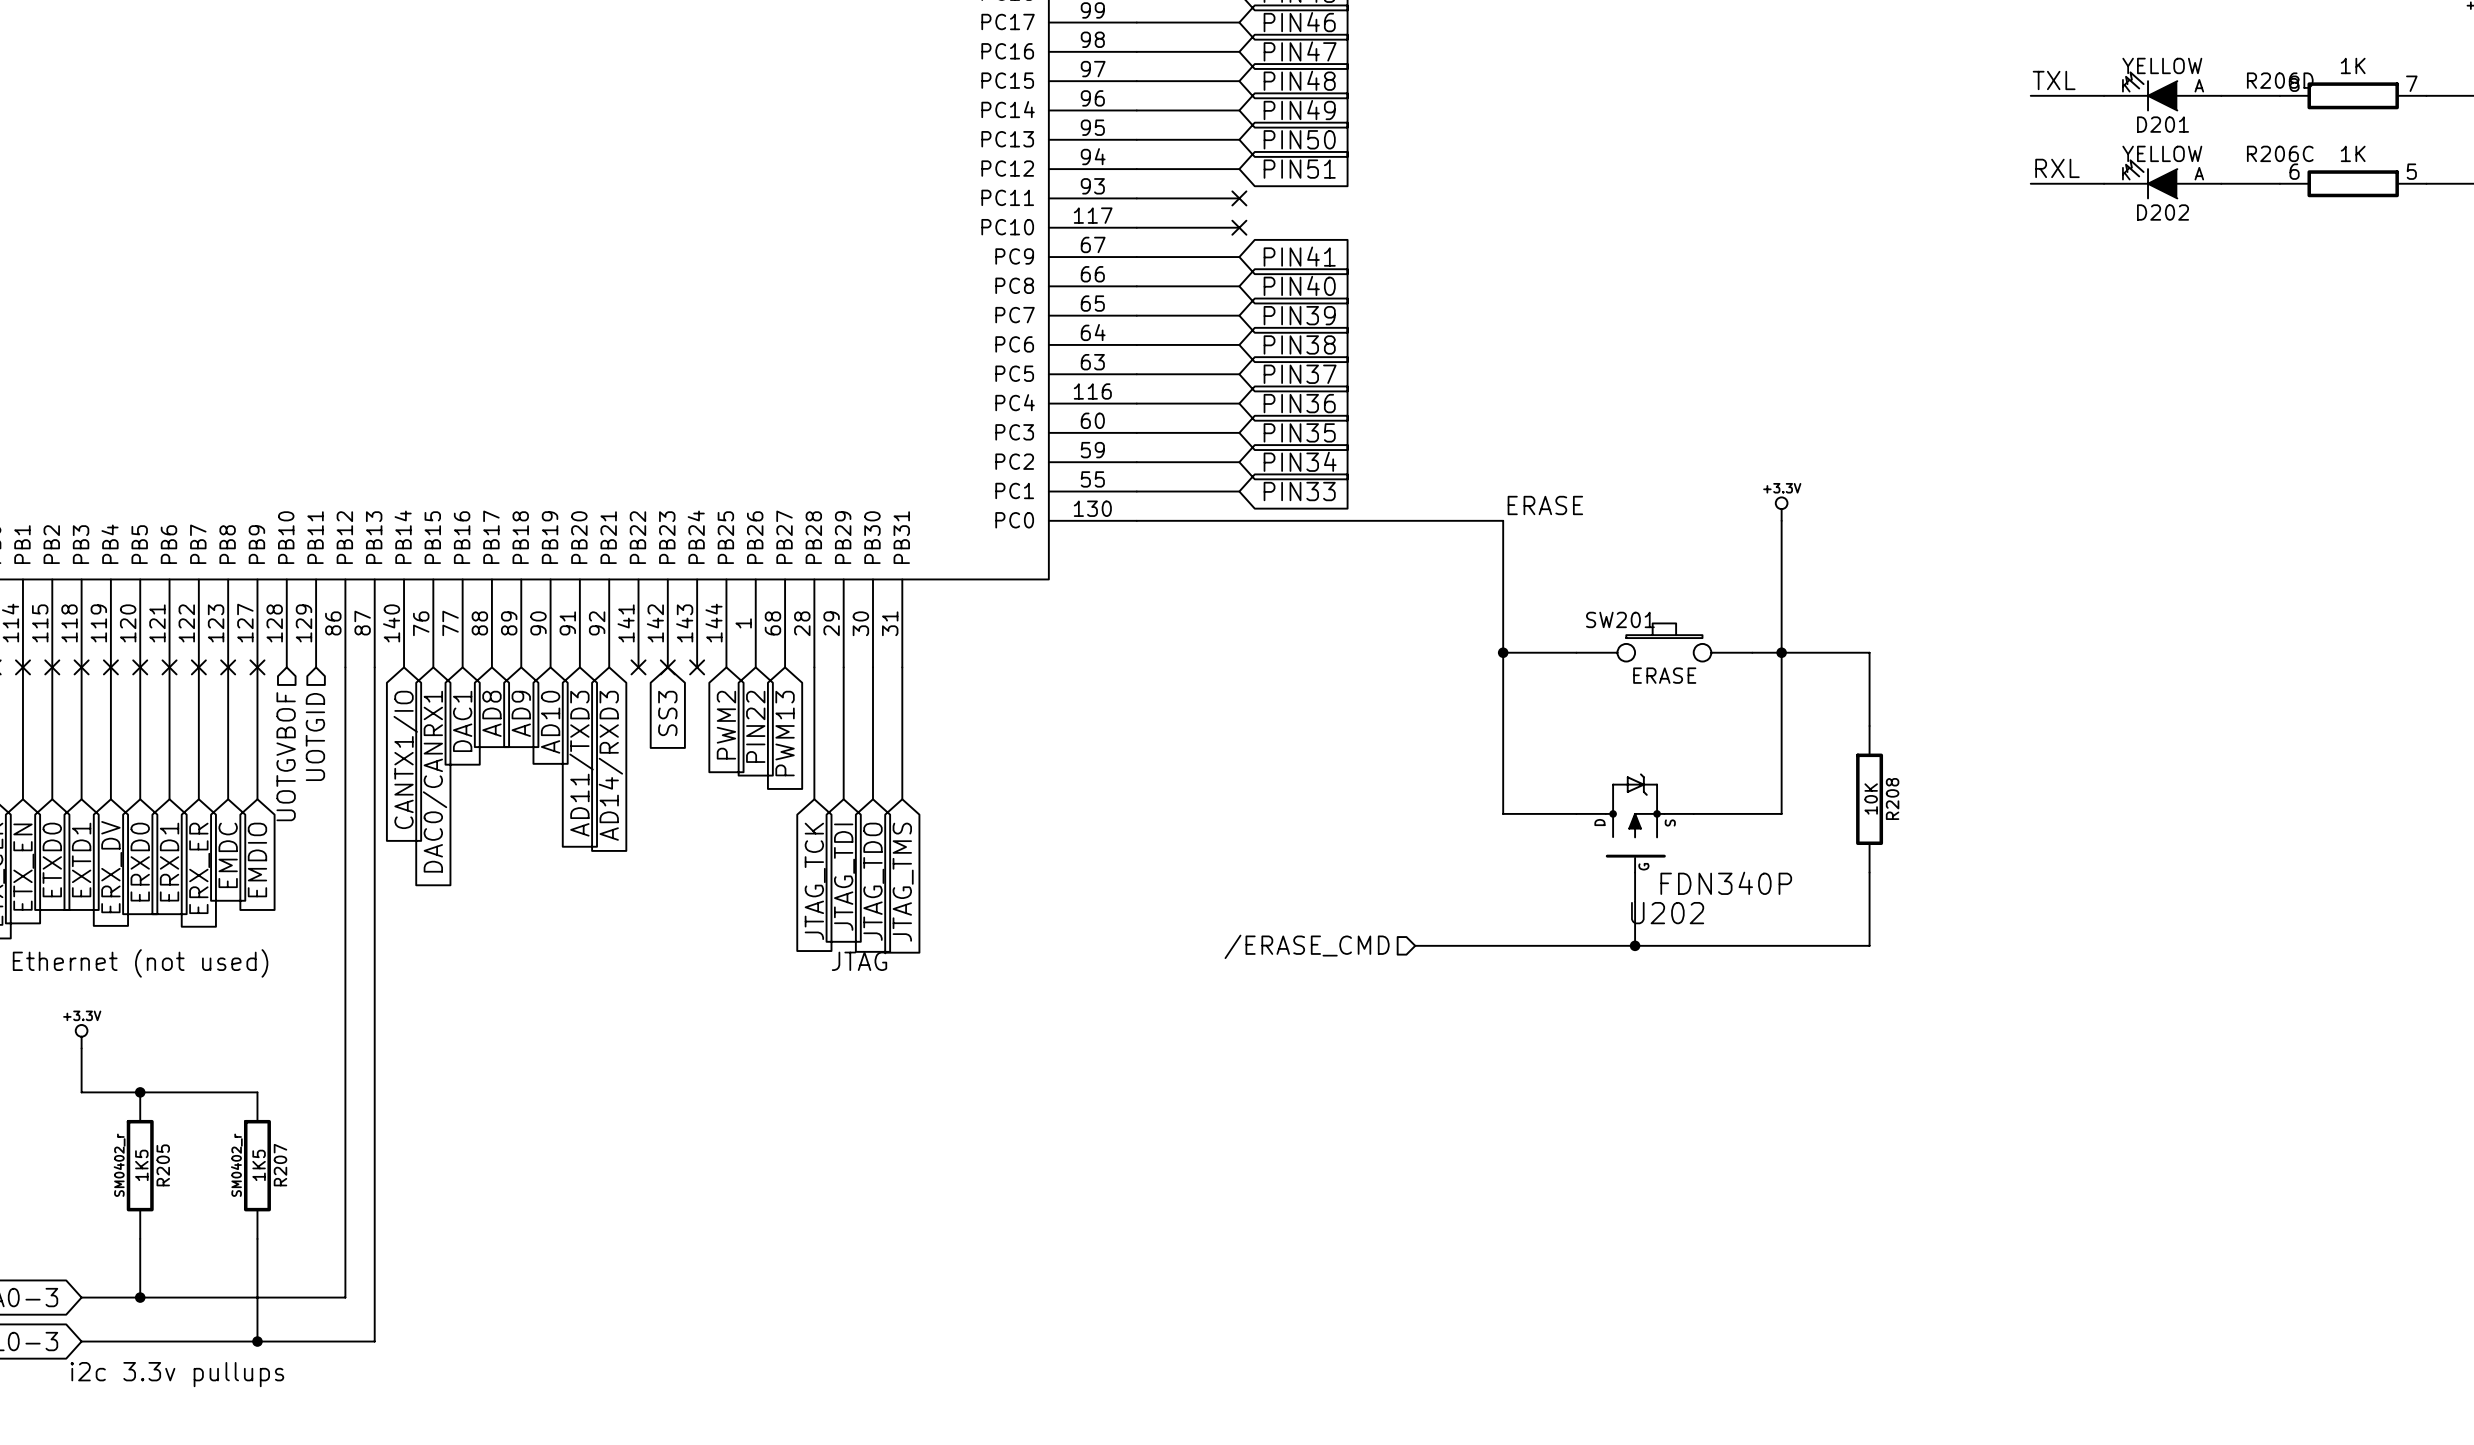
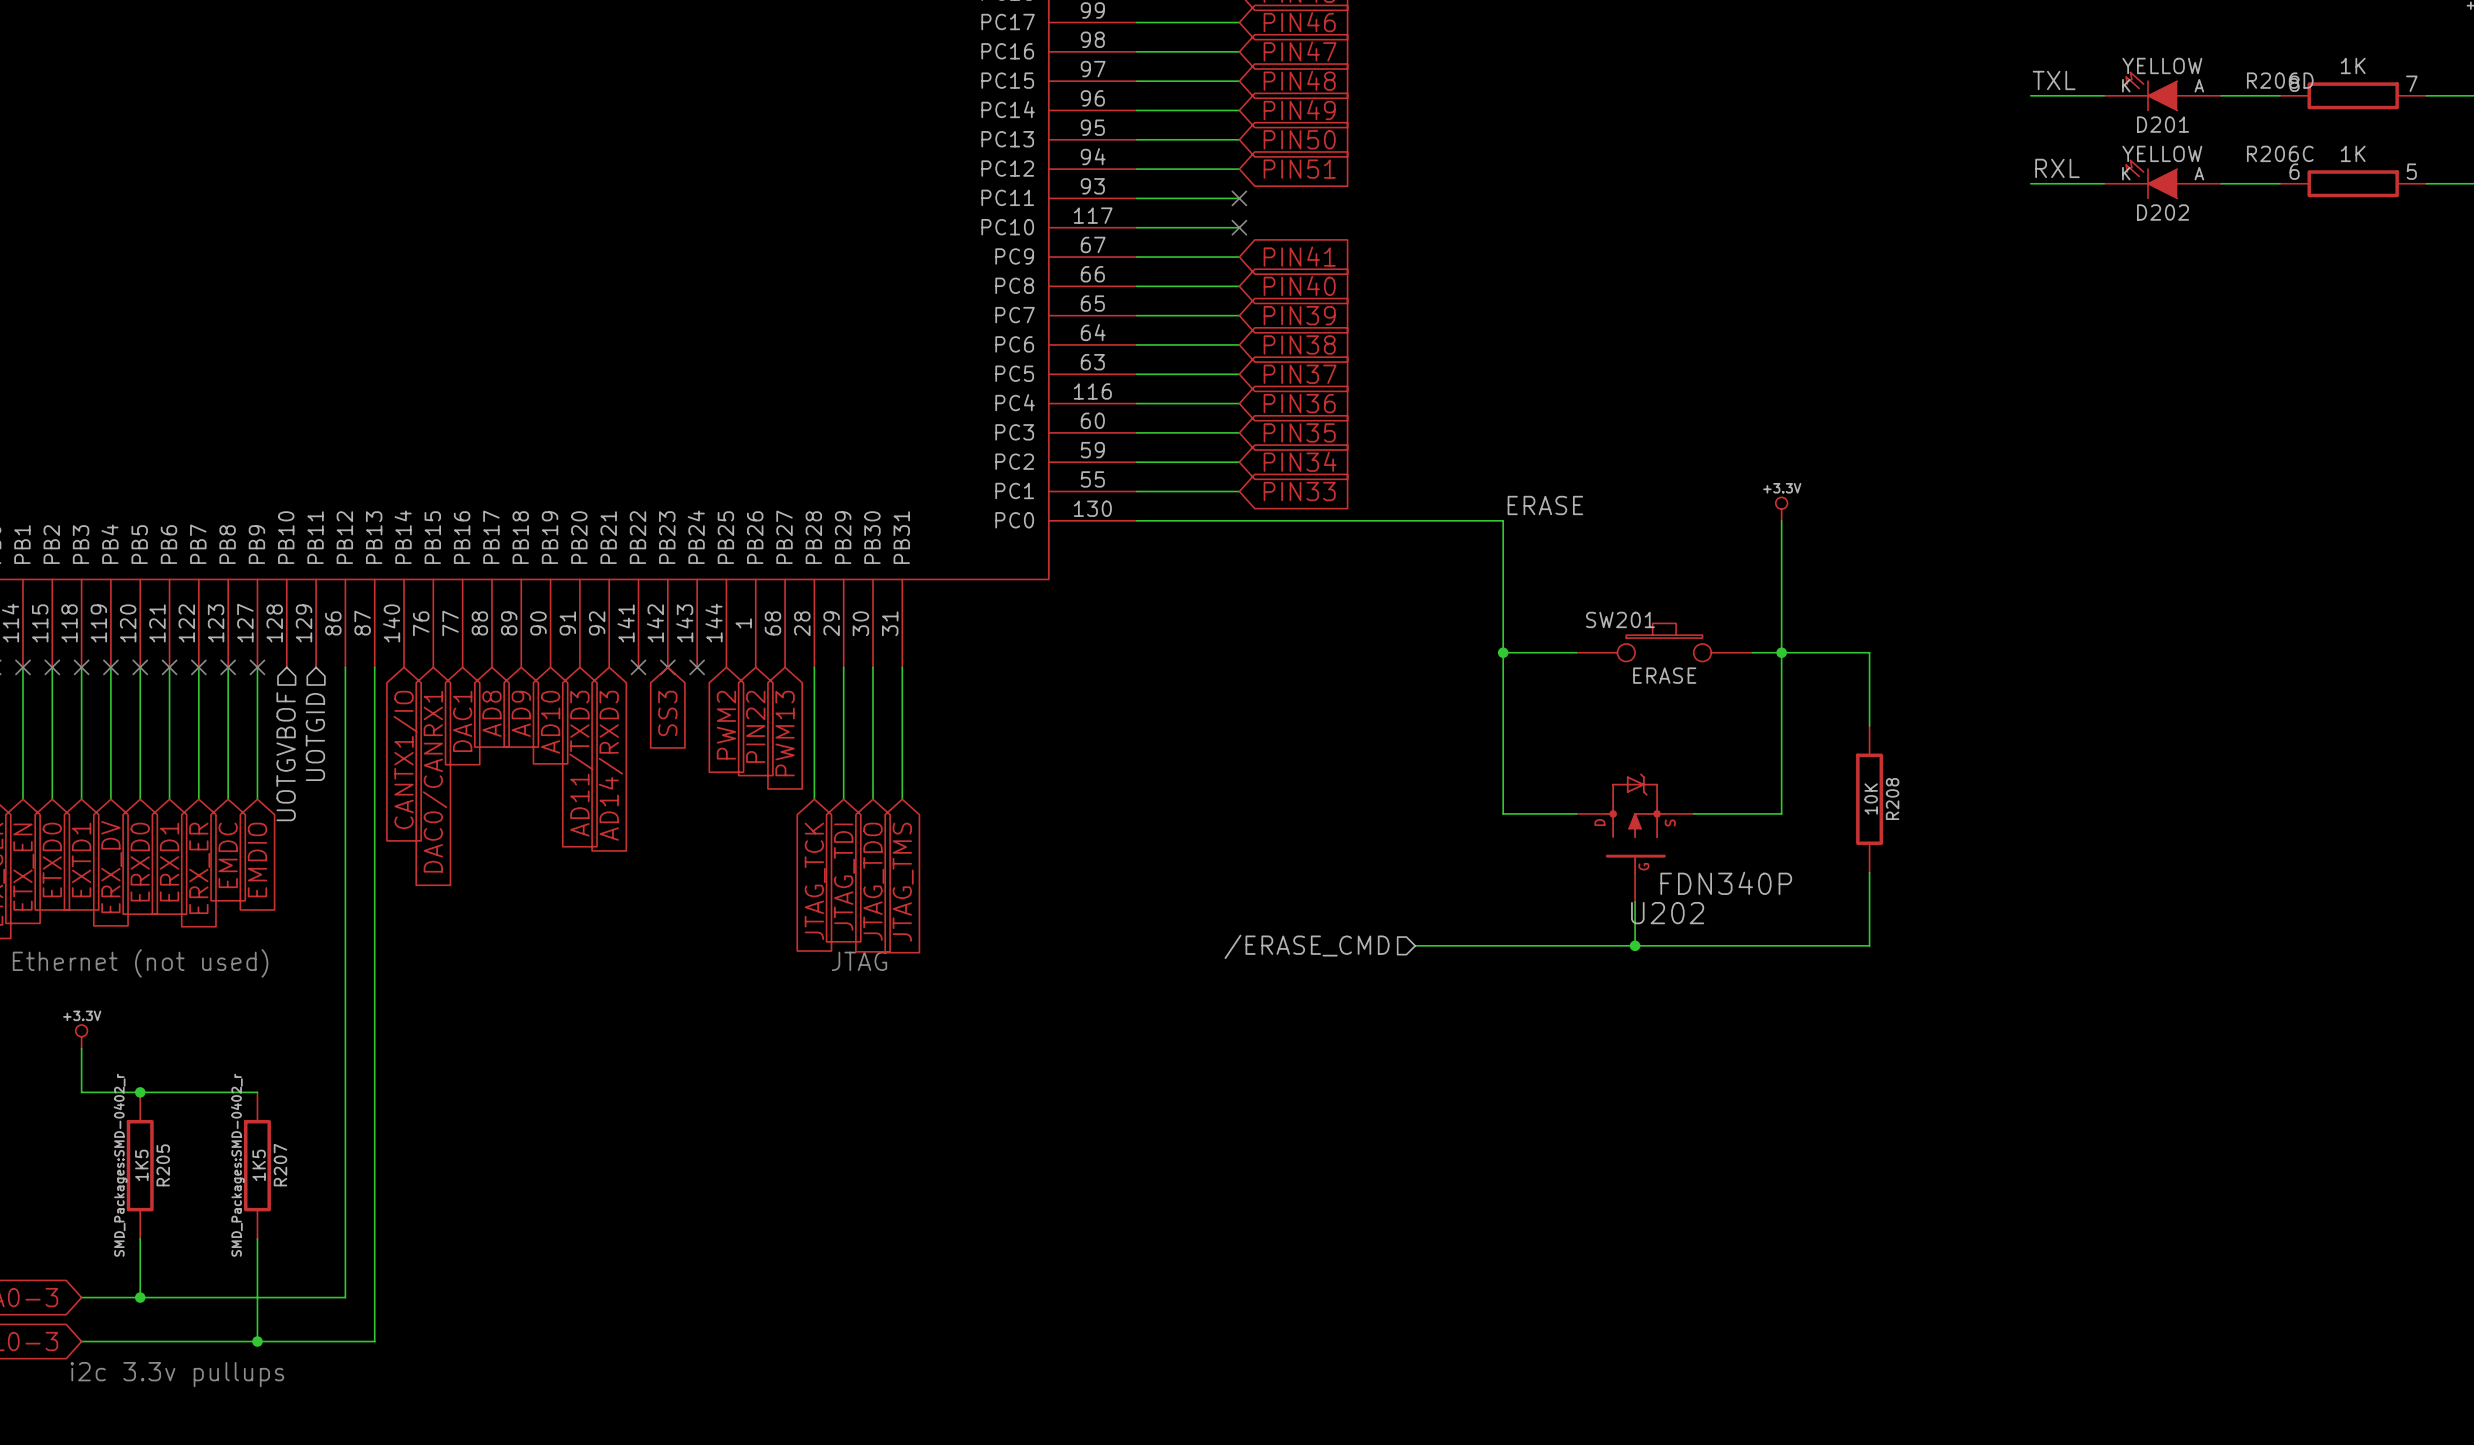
R205 text: SM0402_r (119, 1165) -> SMD_Packages:SMD-0402_r (120, 1165)
R207 text: SM0402_r (236, 1165) -> SMD_Packages:SMD-0402_r (237, 1165)

